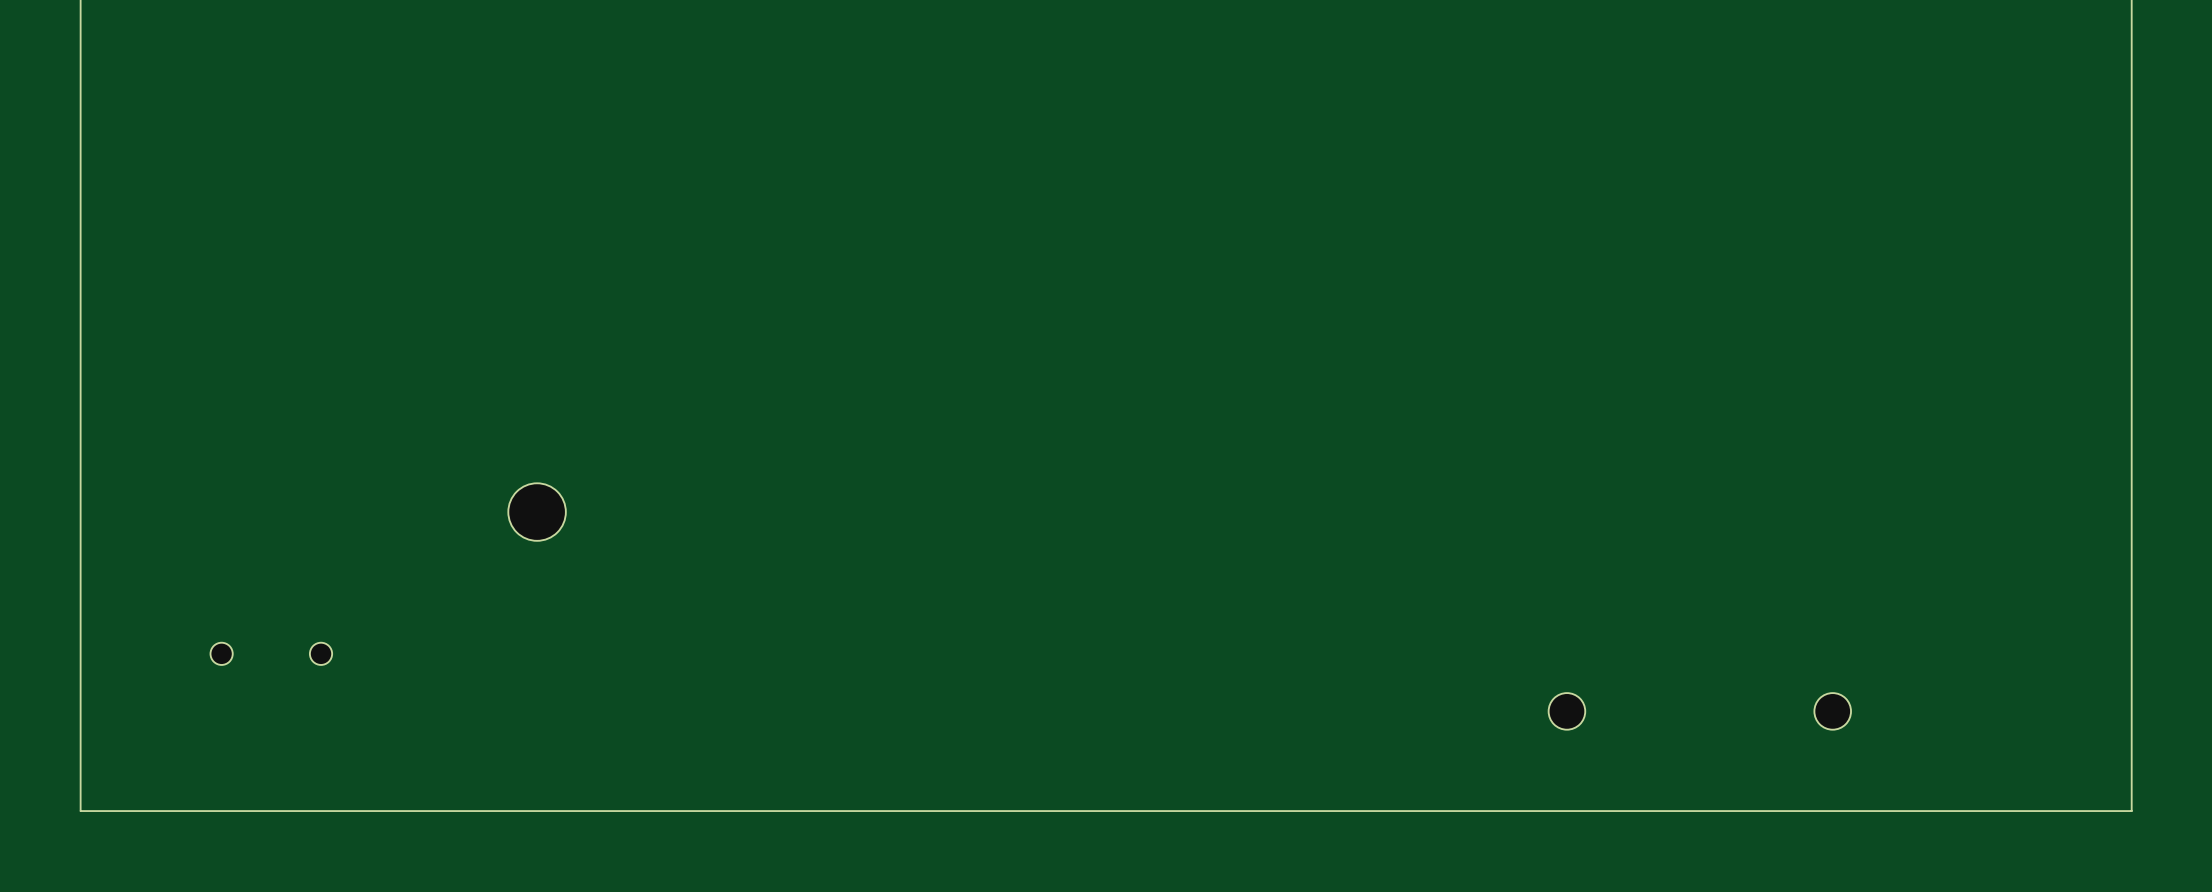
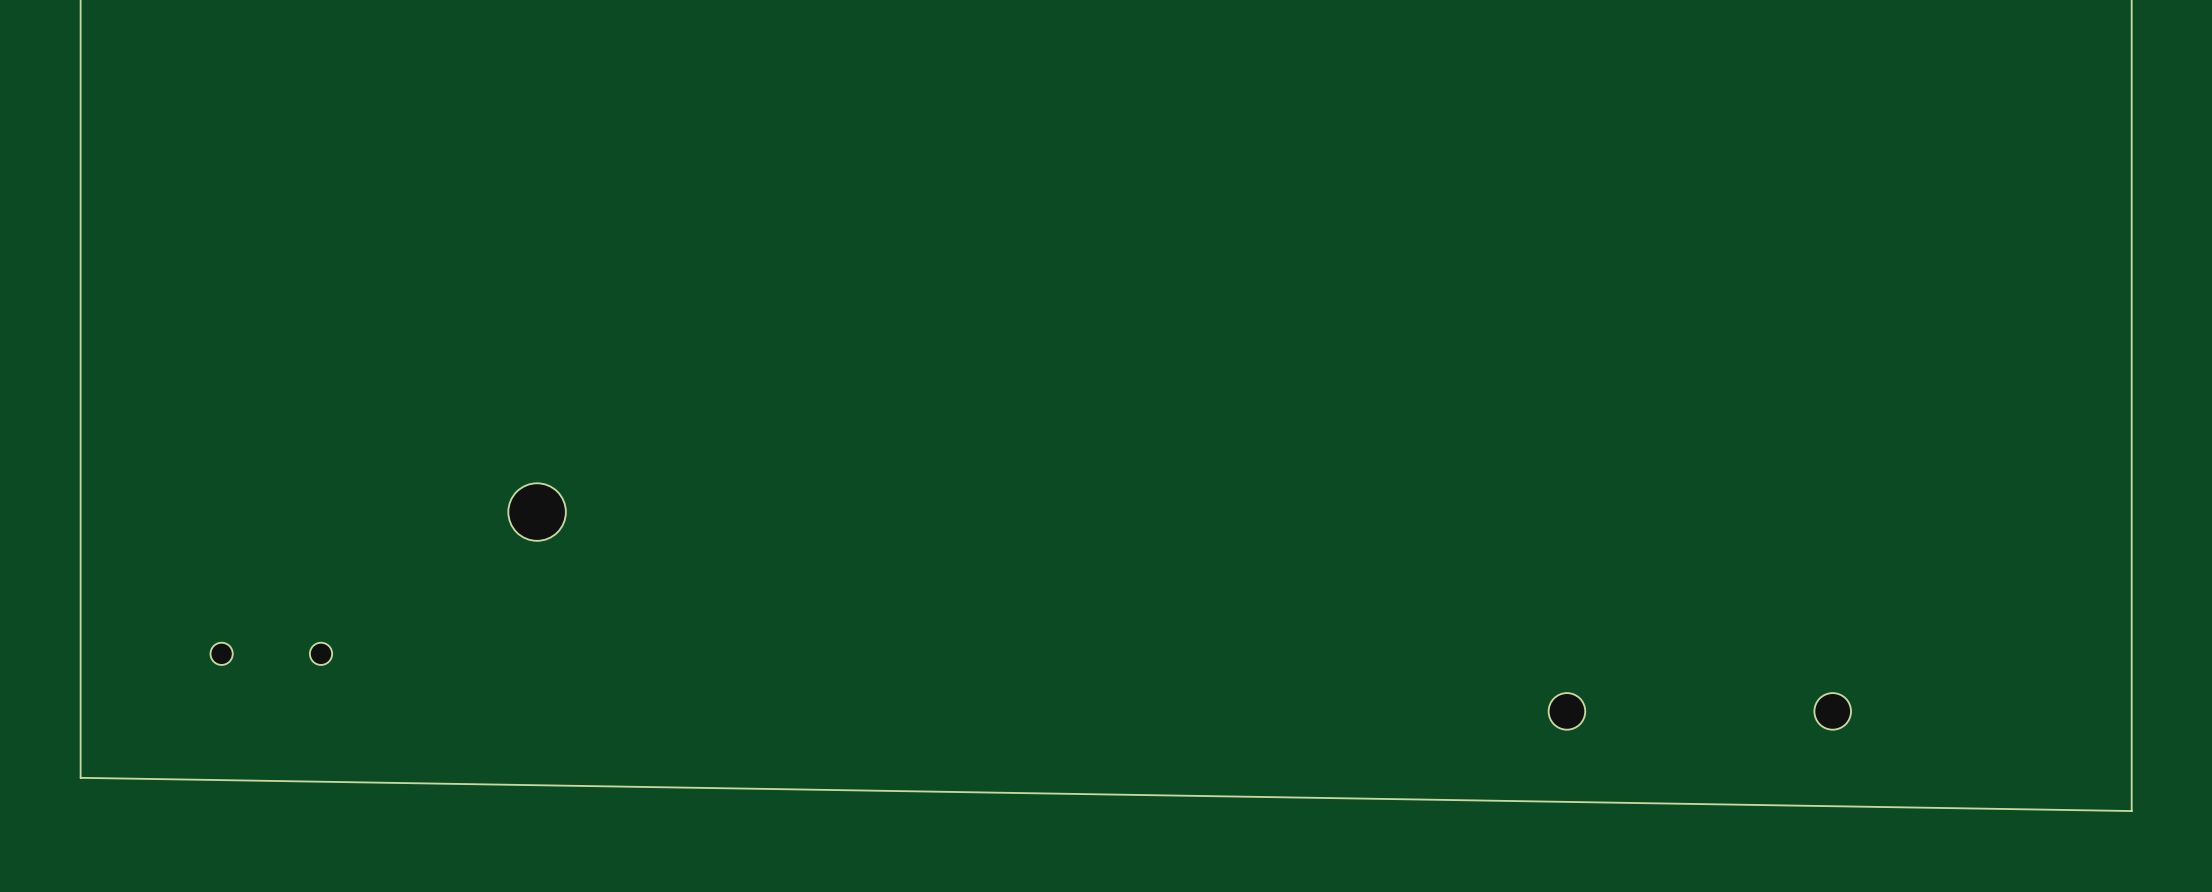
board edge: (80, 777) (80, 811) (2131, 811) -> (80, 777) (2131, 811)

